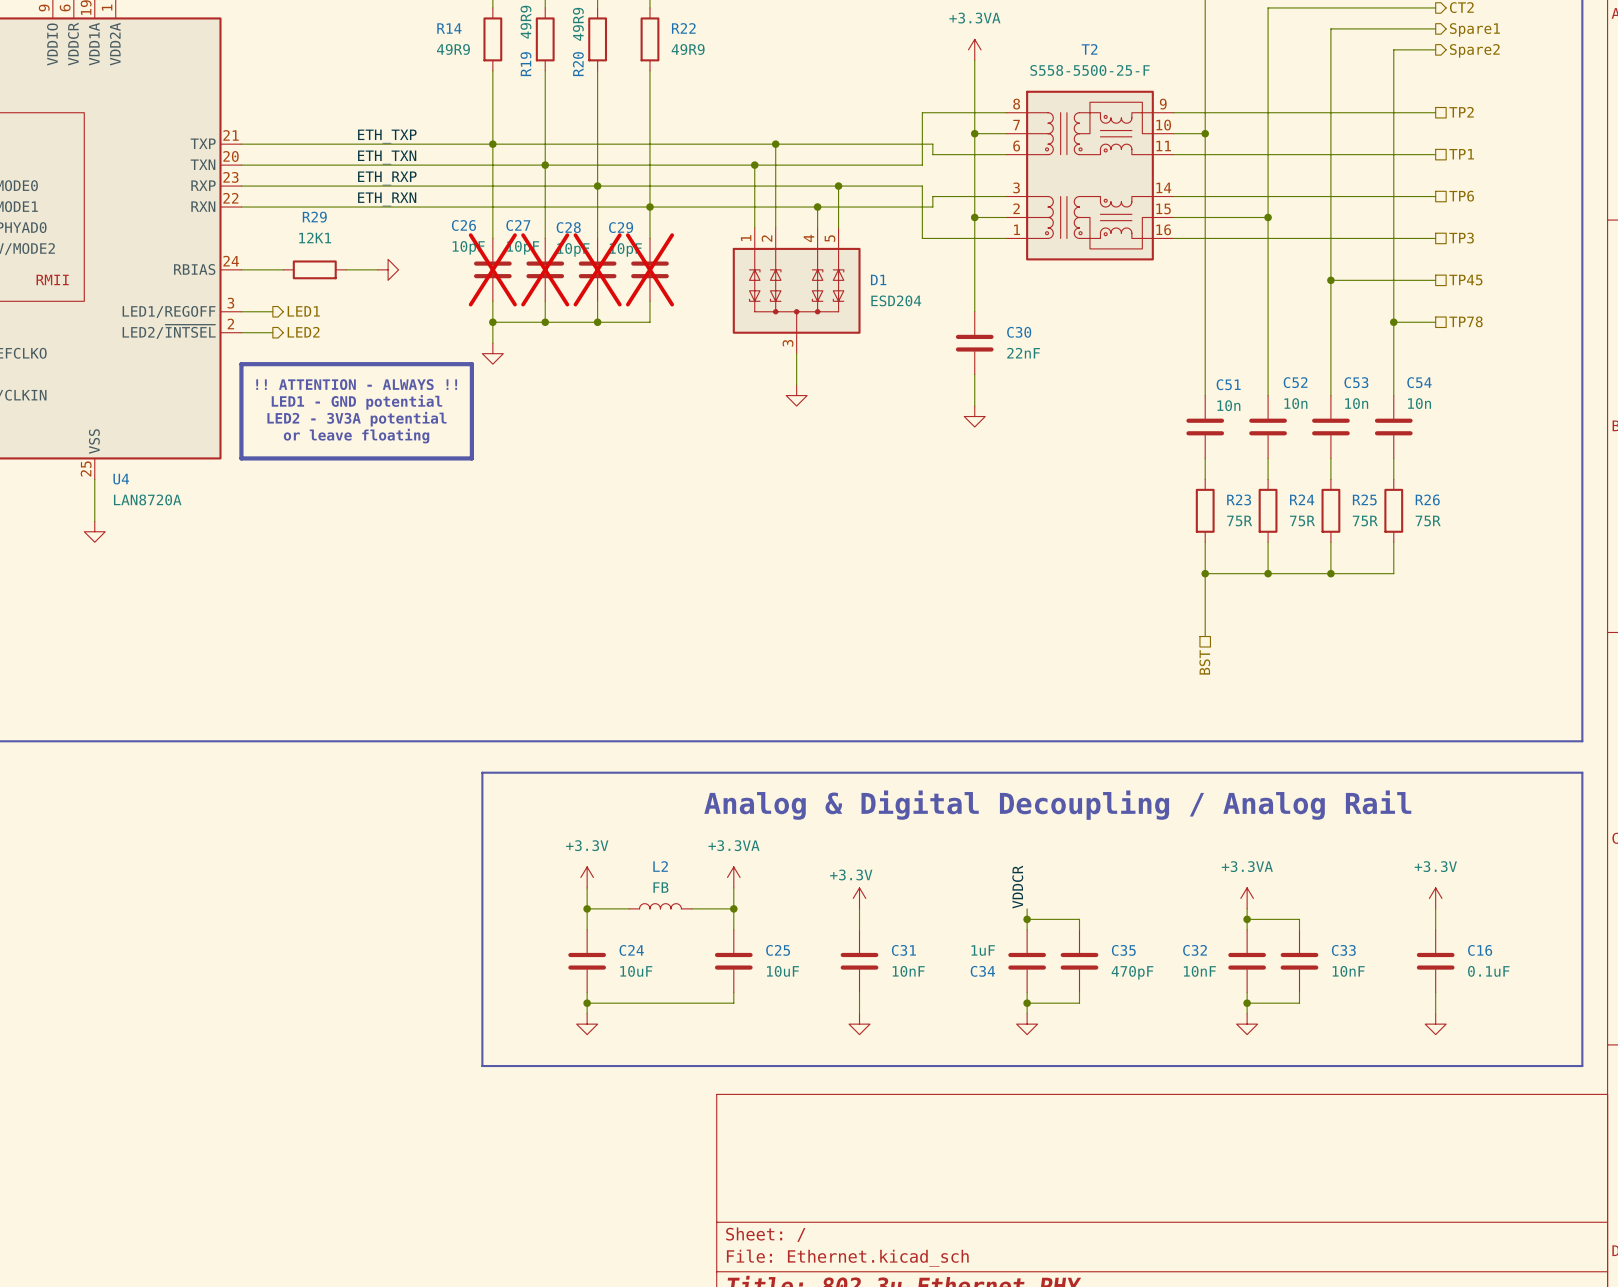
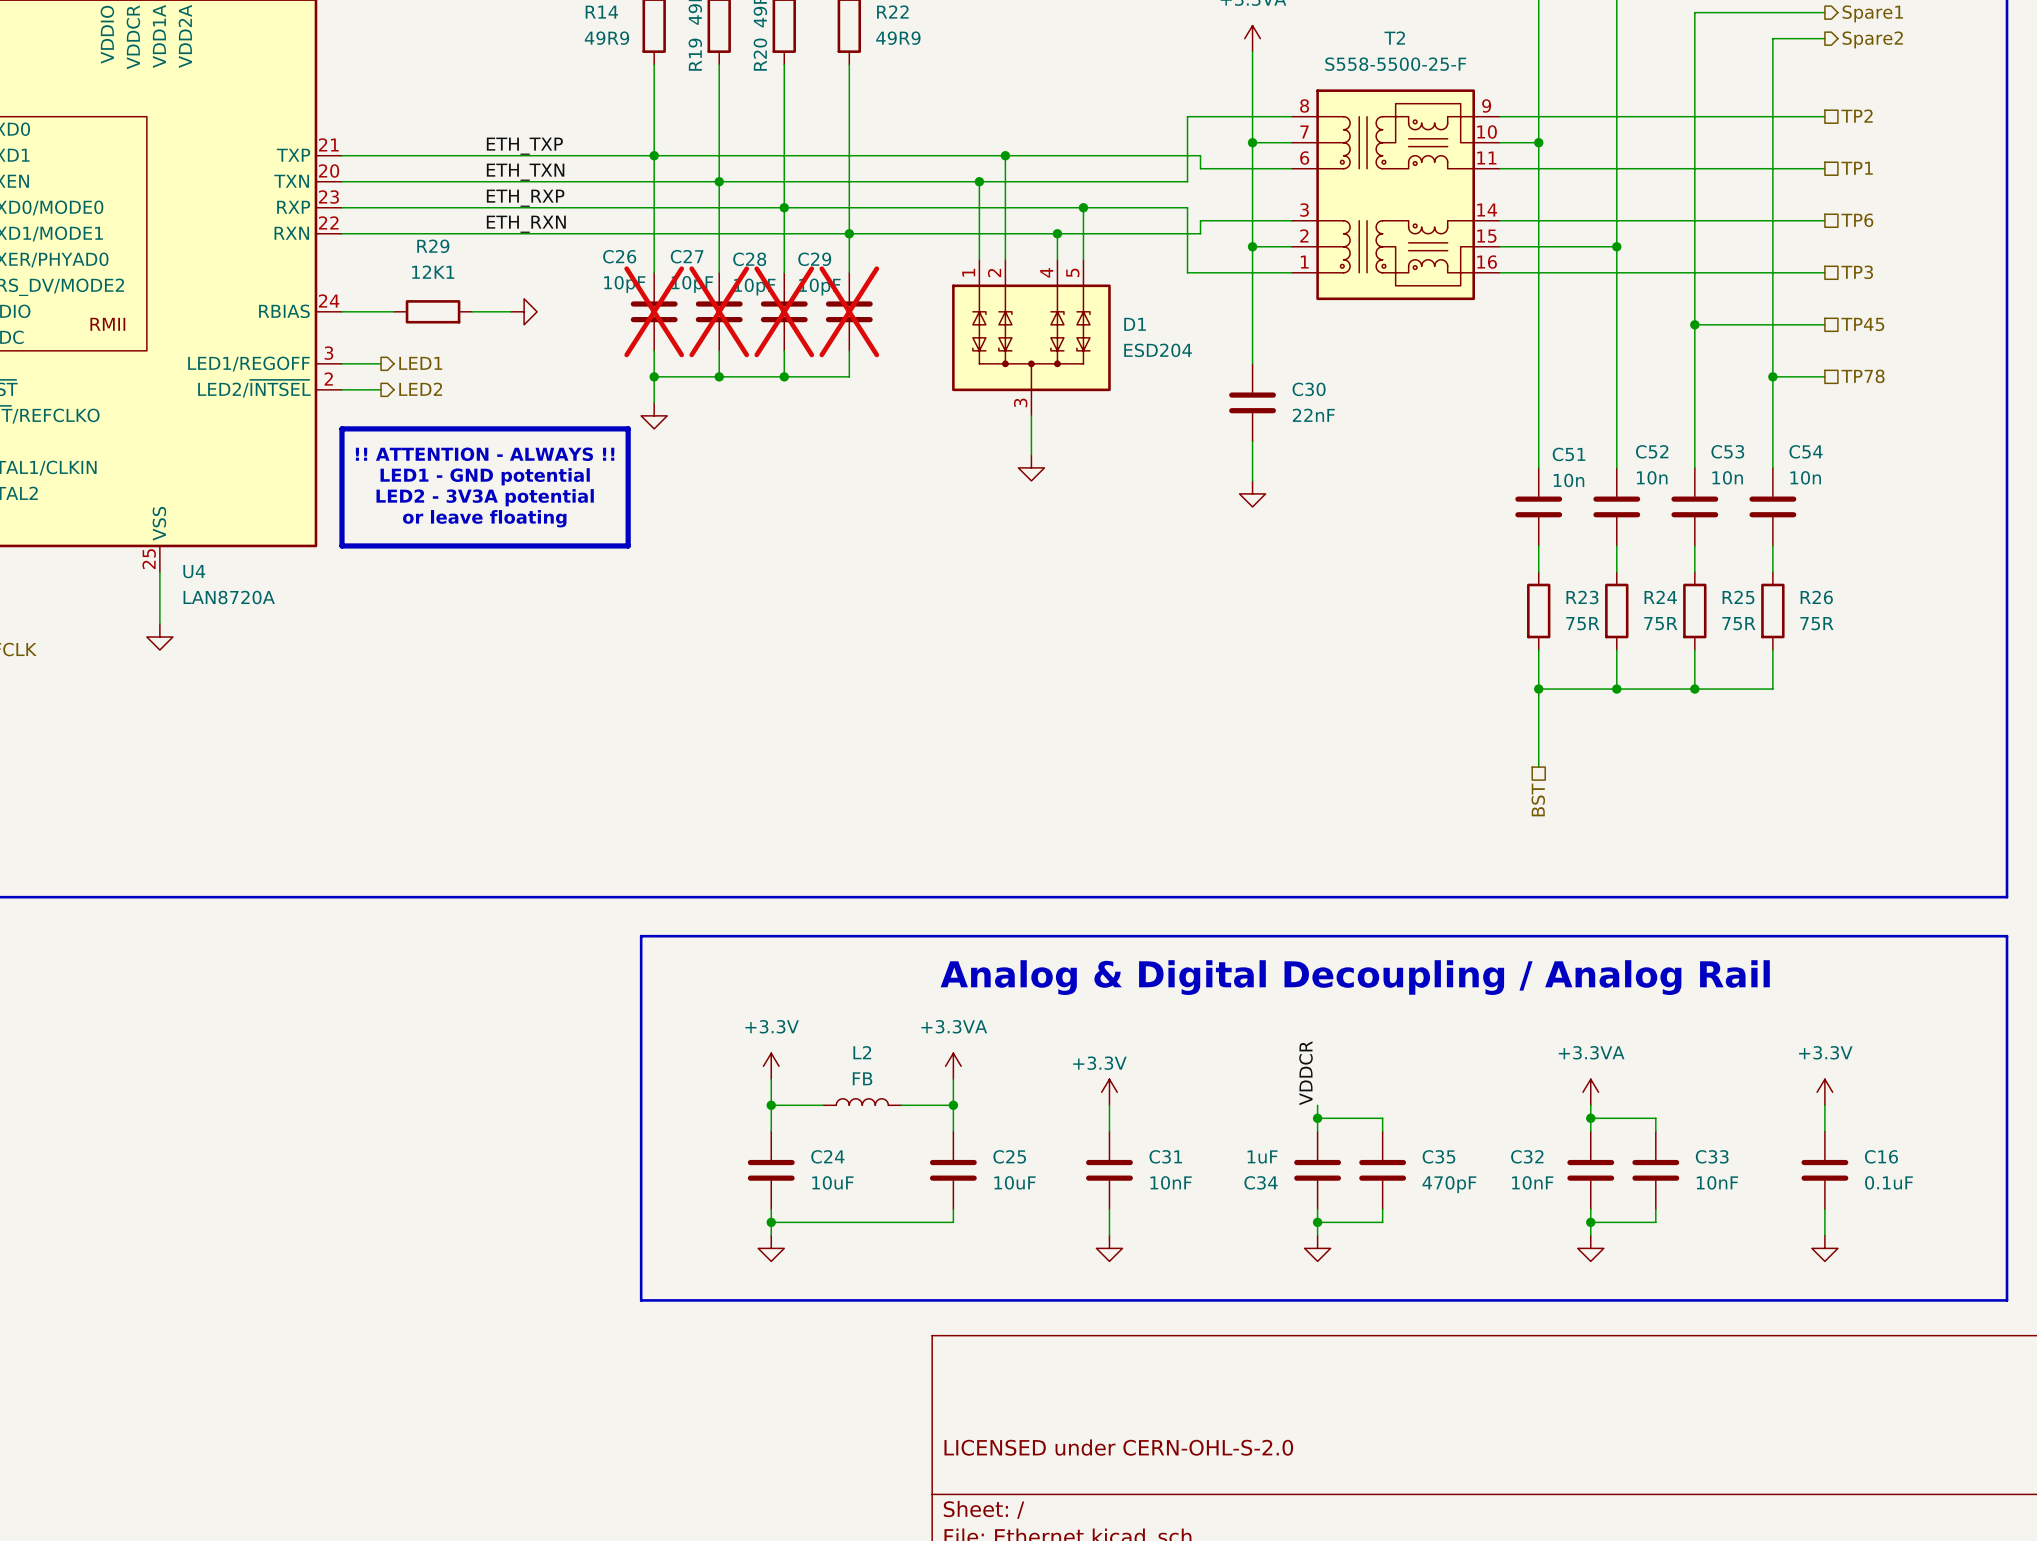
title block: none -> LICENSED under CERN-OHL-S-2.0 (1118, 1447)

